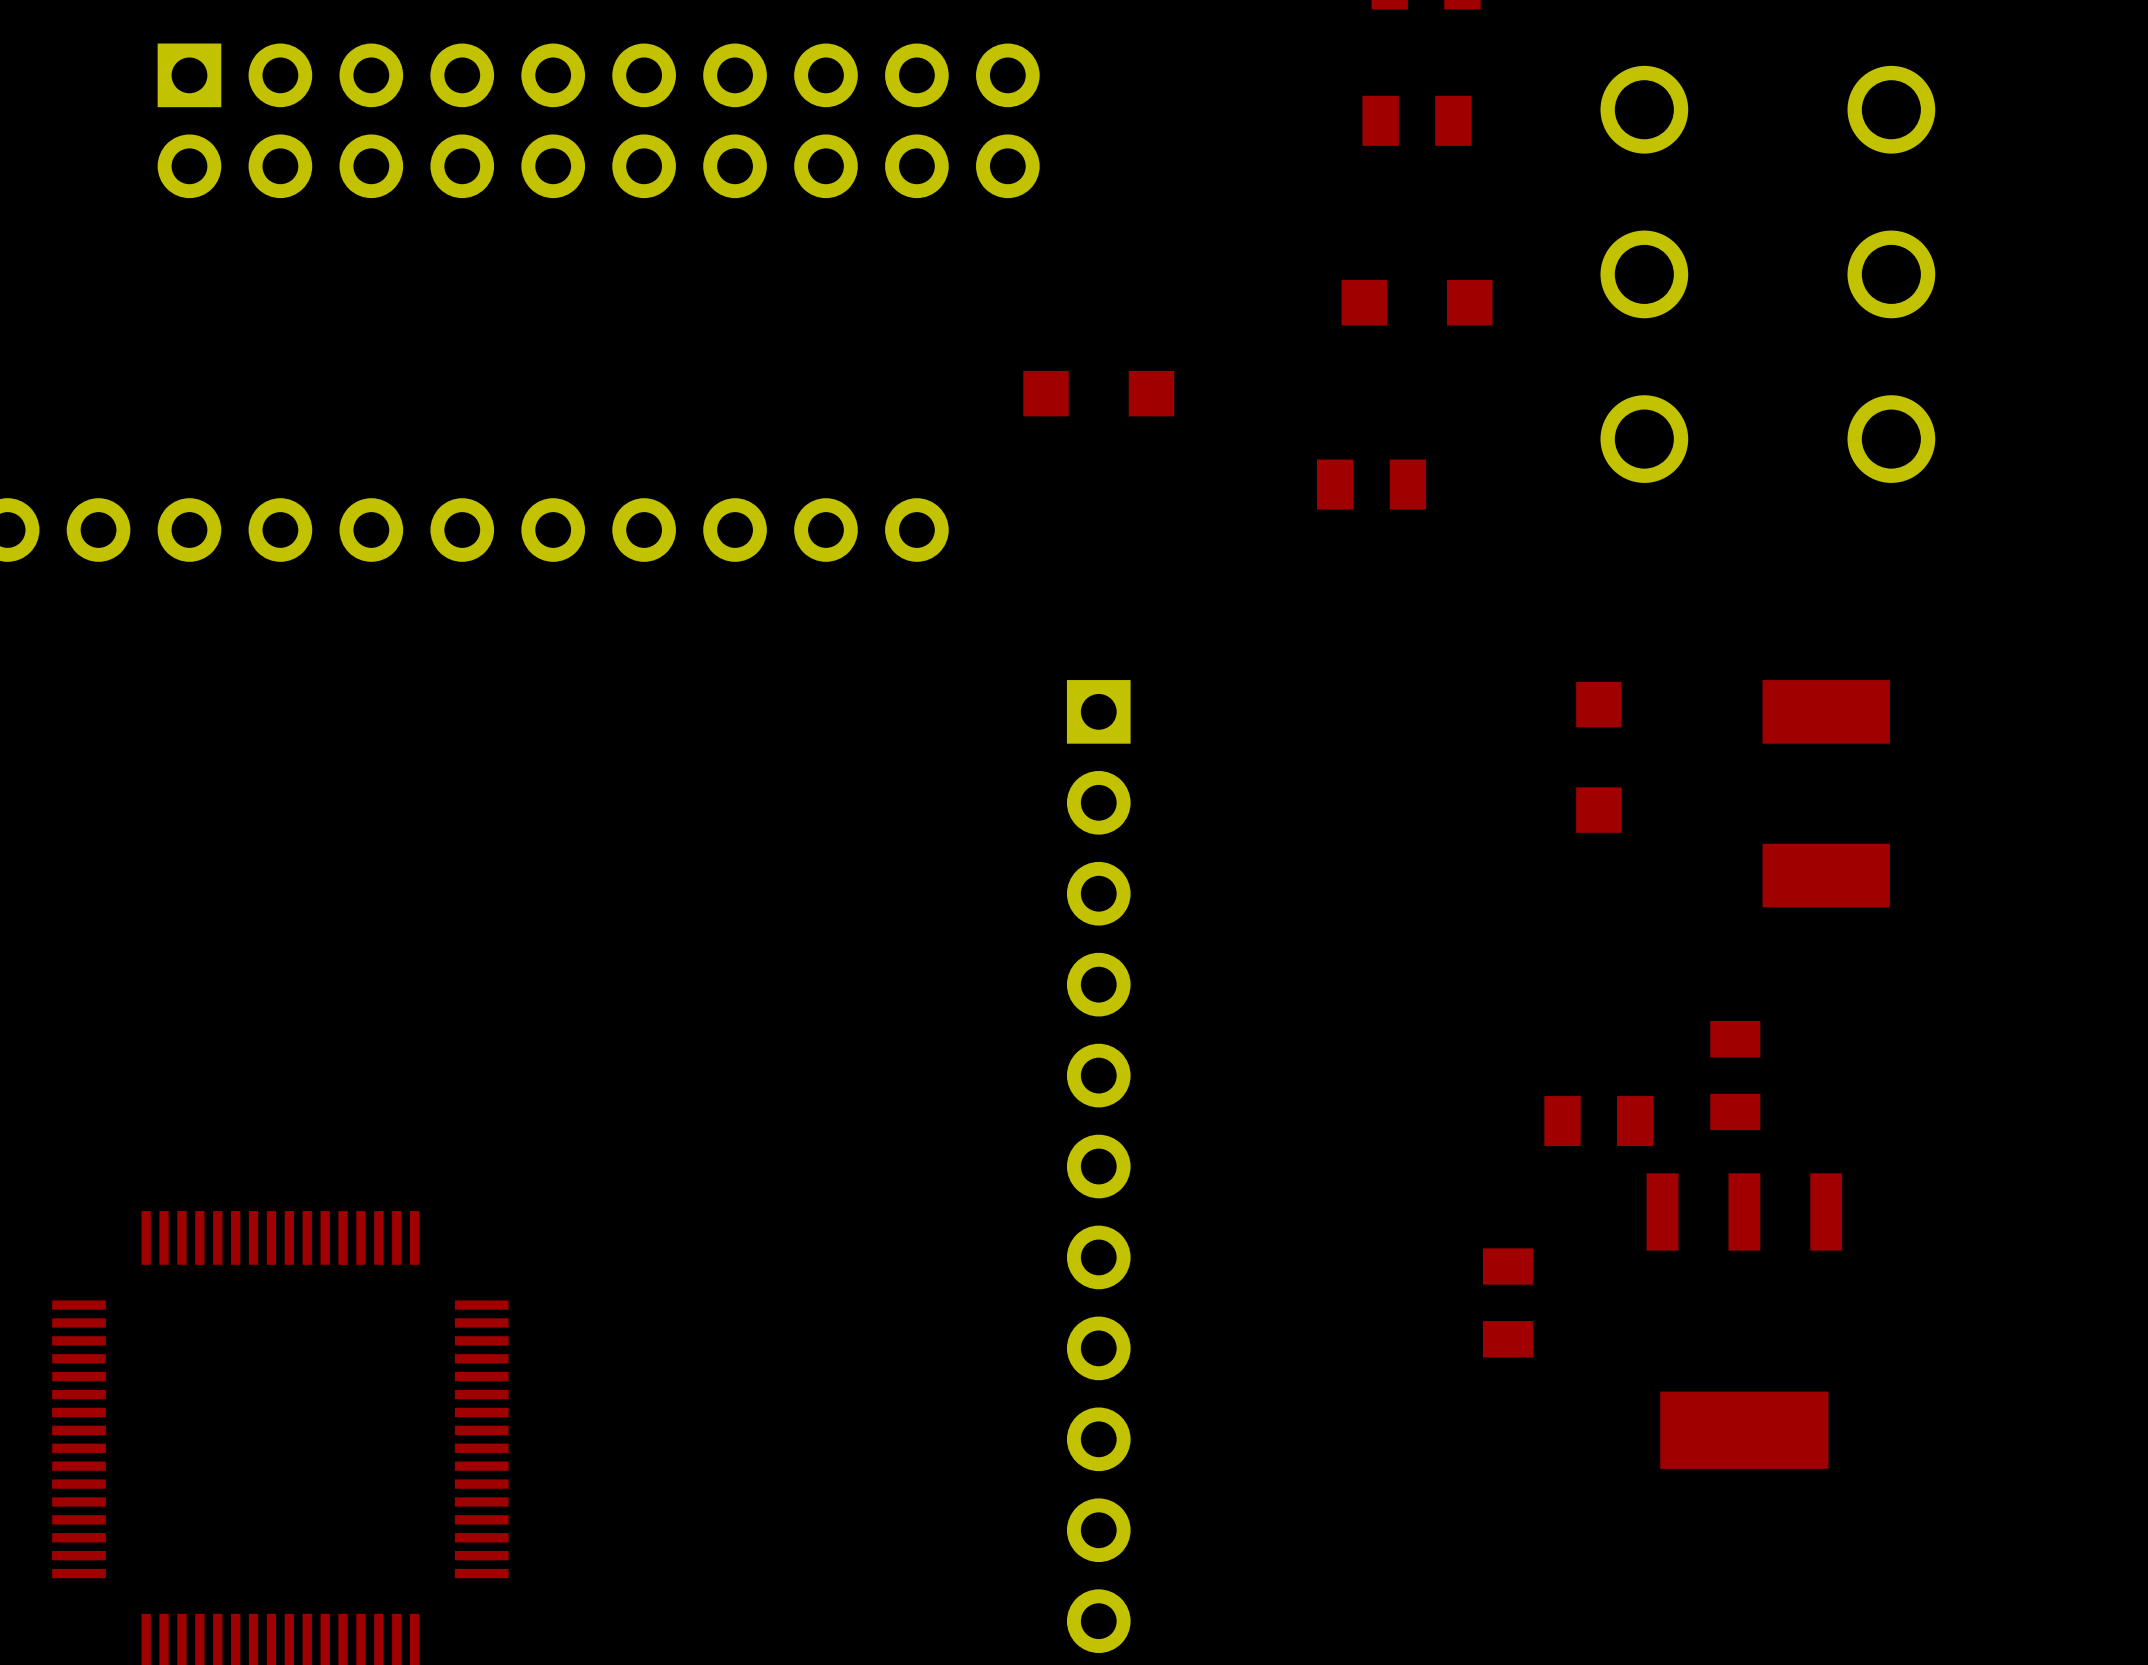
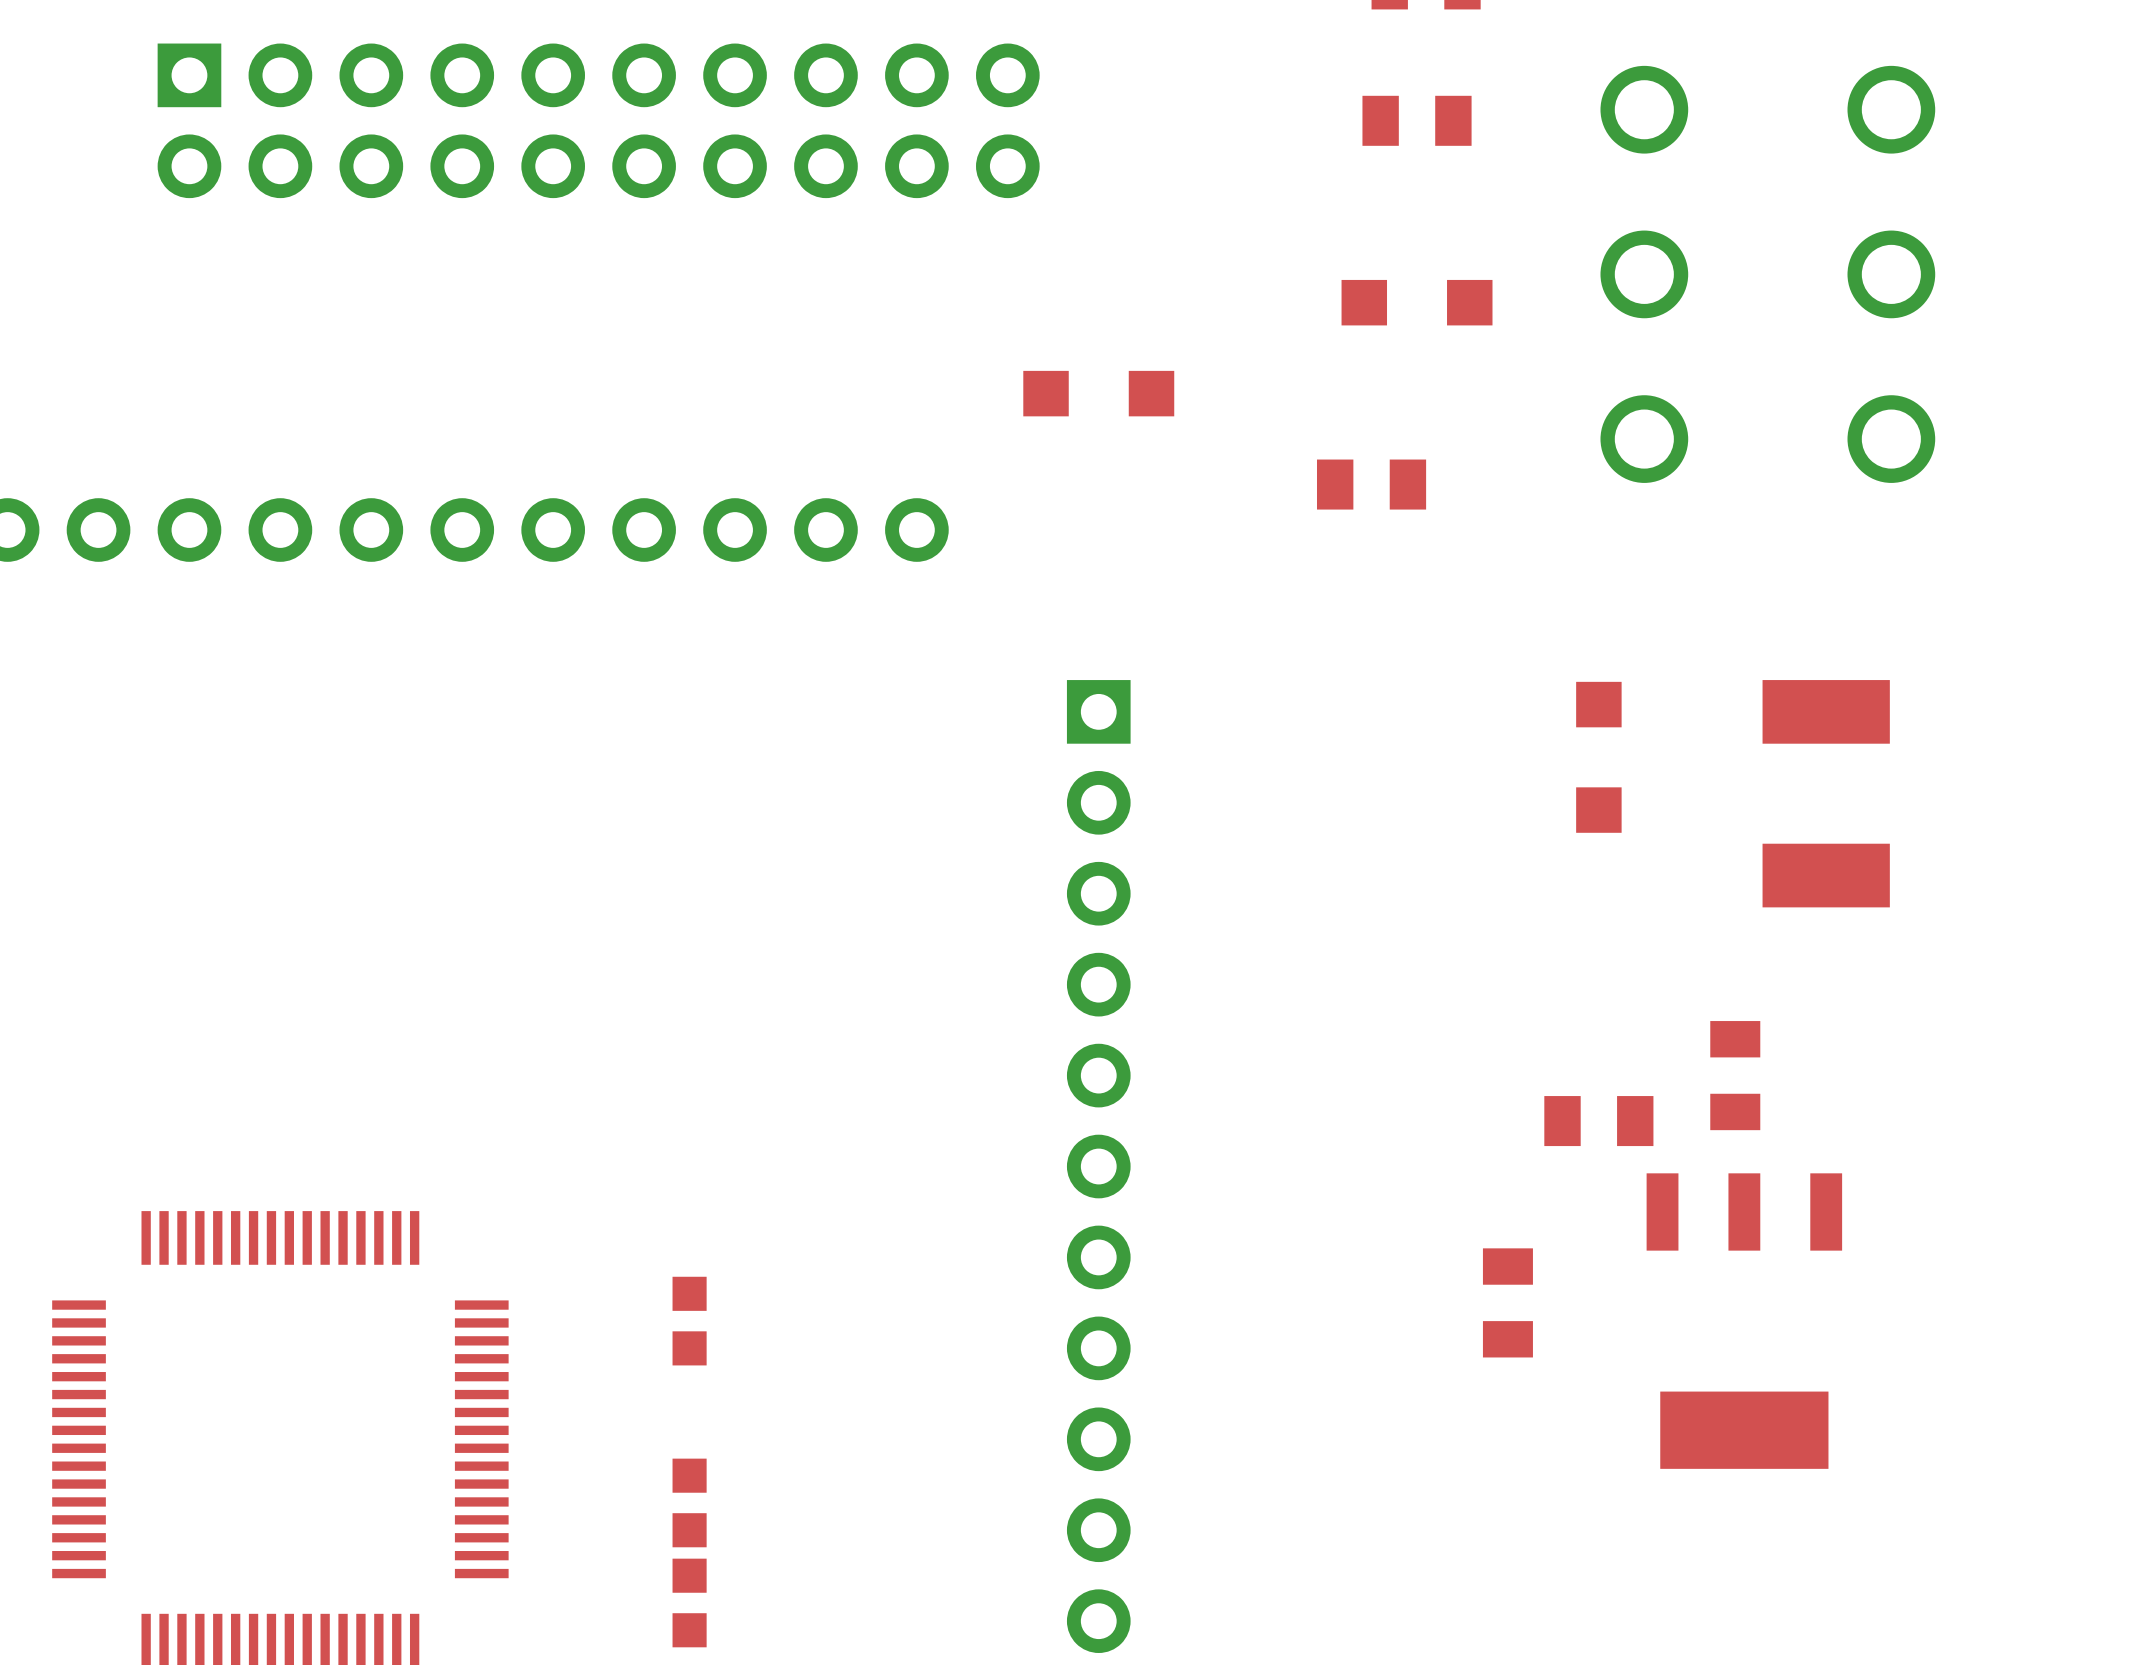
part: none -> (689, 1321)
part: none -> (689, 1502)
part: none -> (689, 1602)

